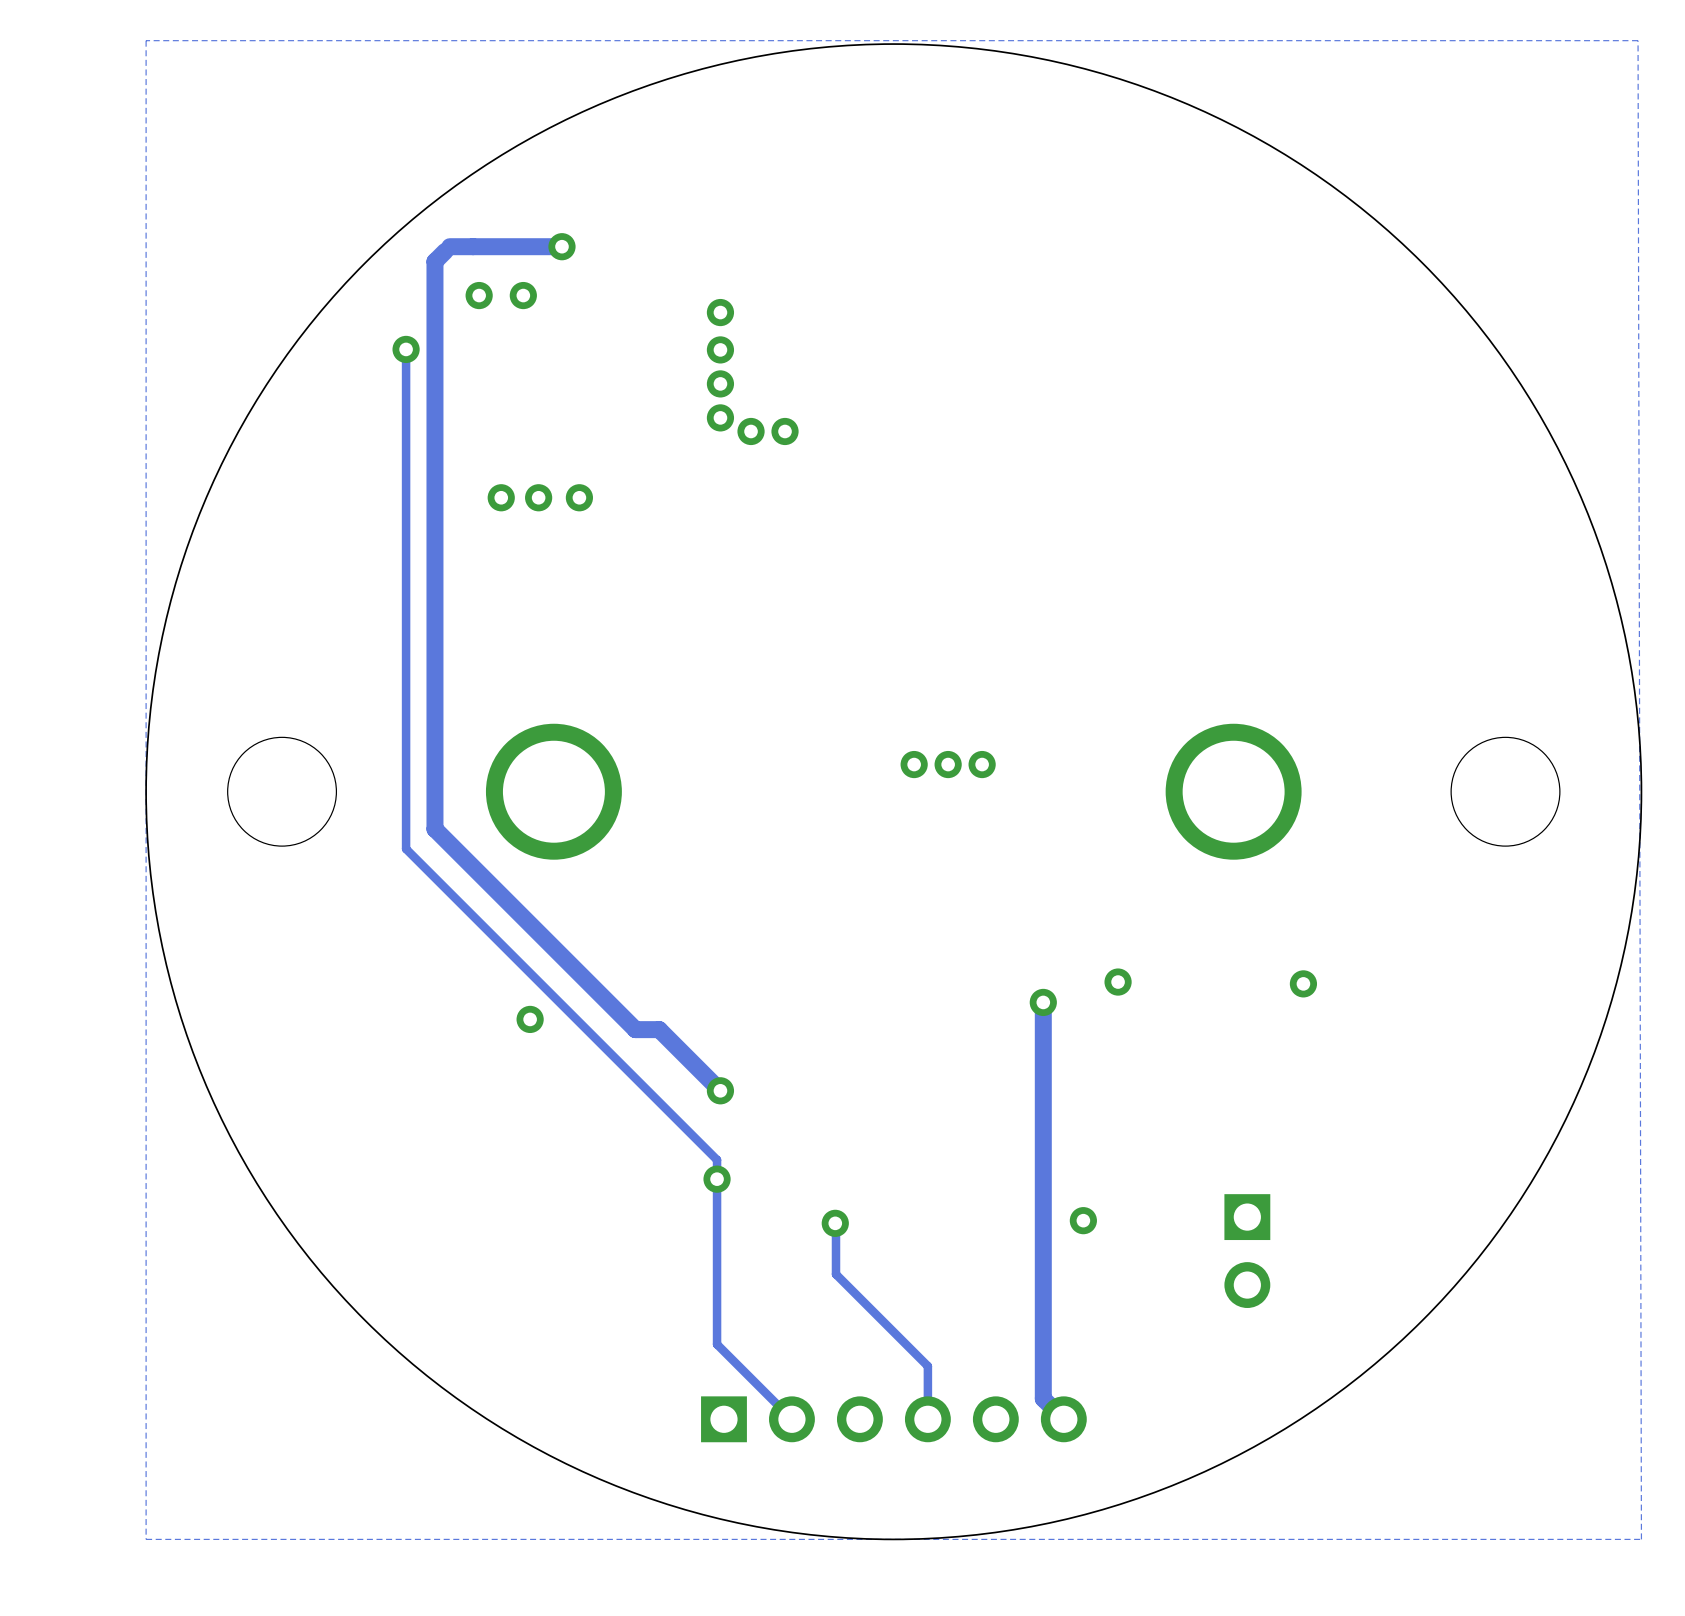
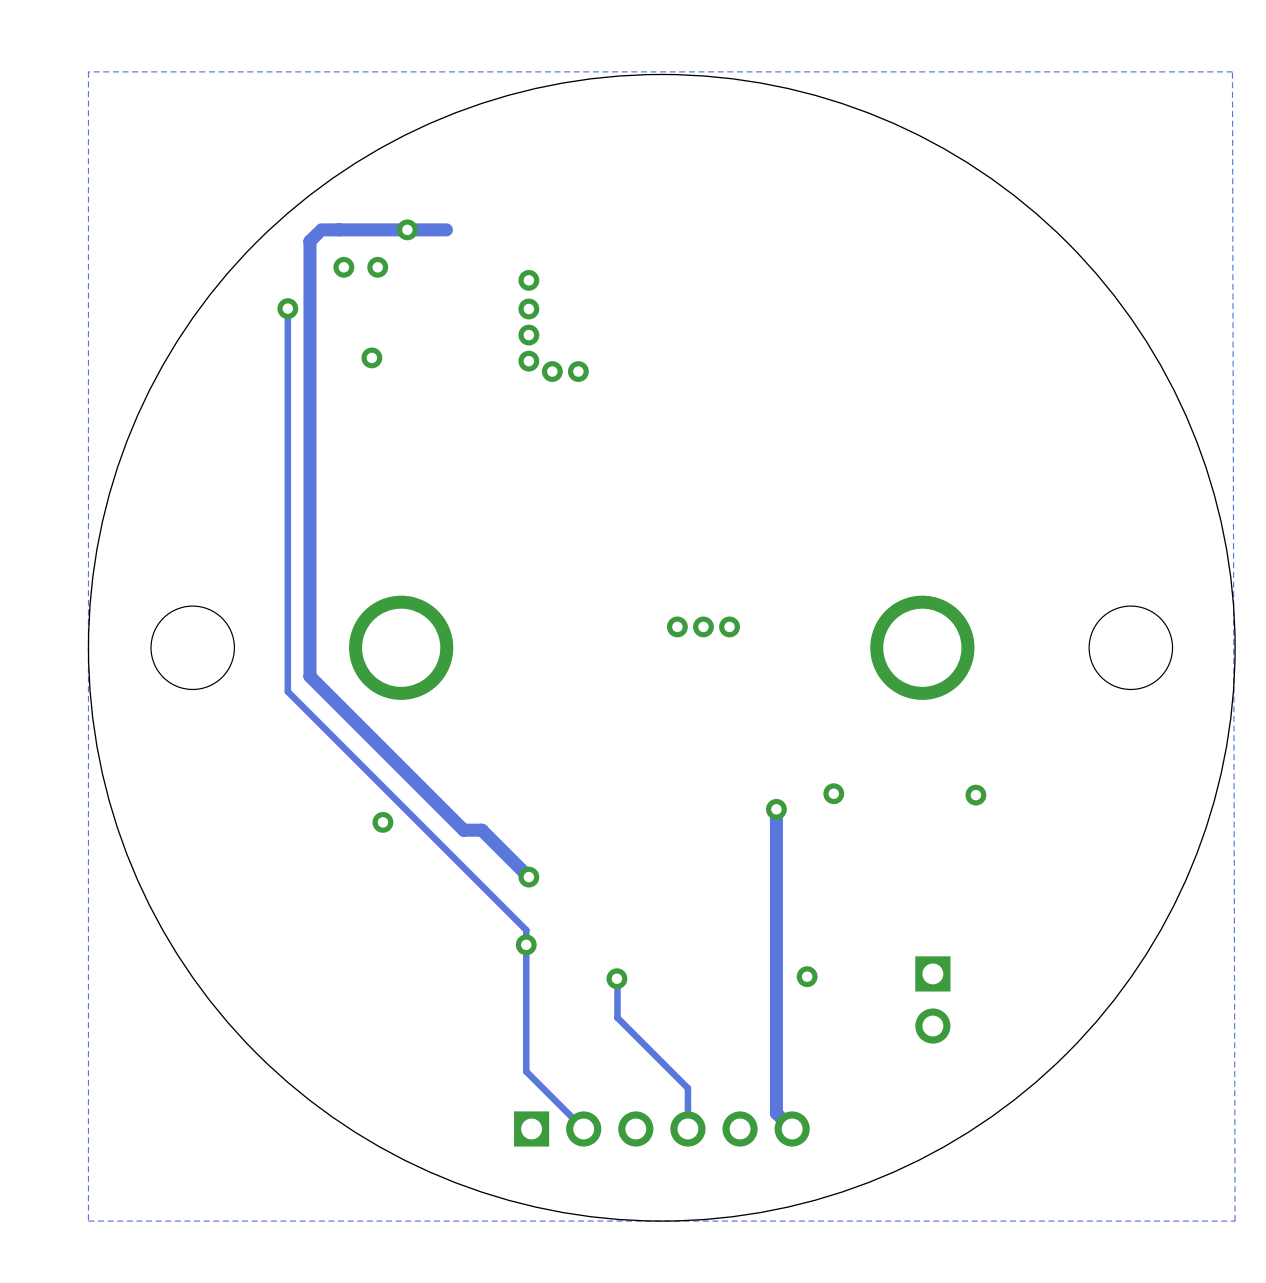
track: none -> (446, 229) (407, 229)
via: none -> (371, 357)
via: (501, 497) -> none
via: (538, 497) -> none
via: (579, 497) -> none

